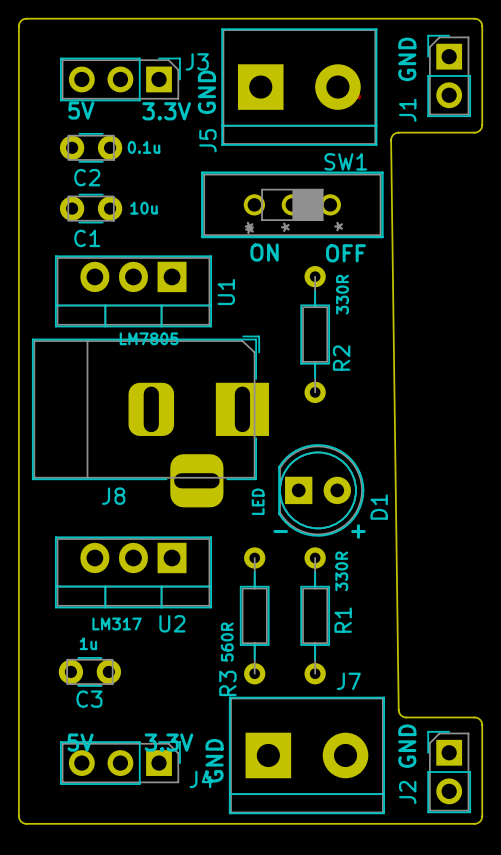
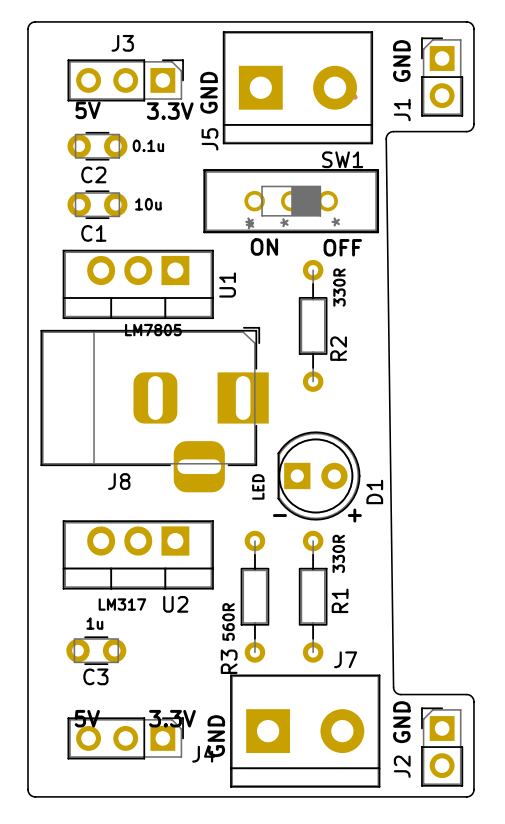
J3 name position: J3 (197, 61) -> J3 (122, 43)

